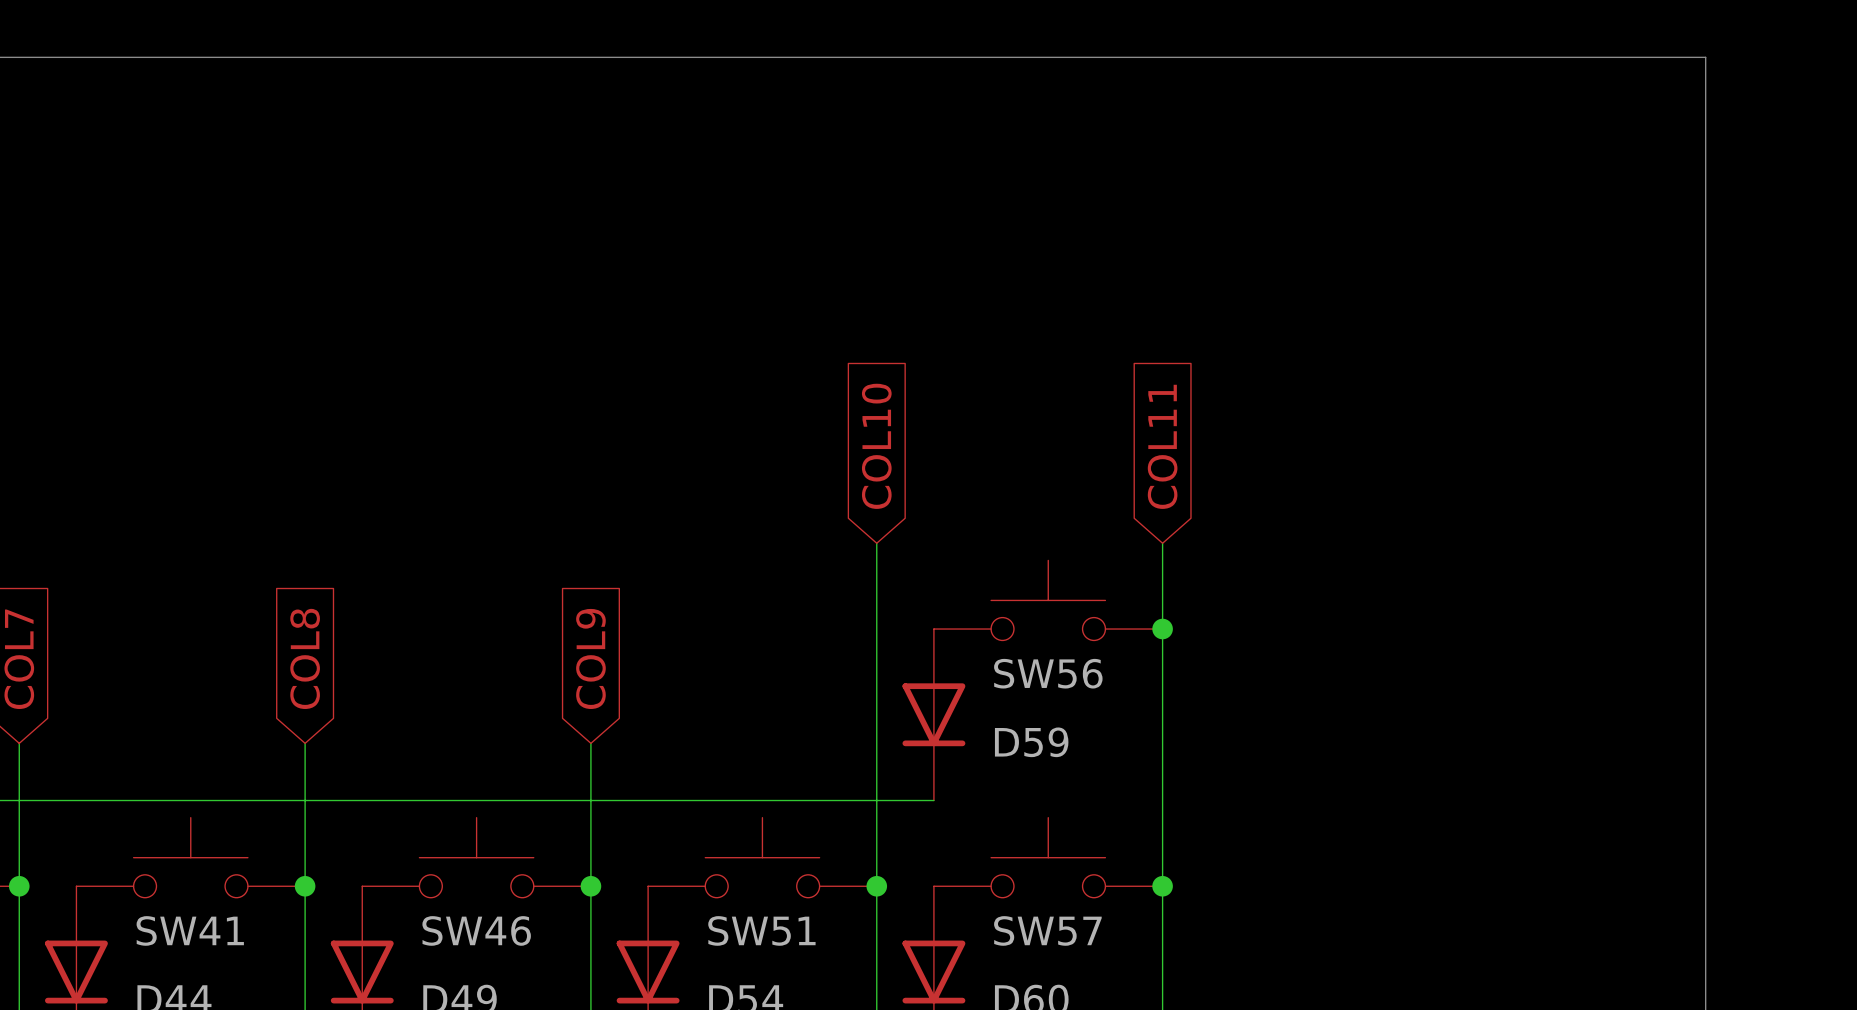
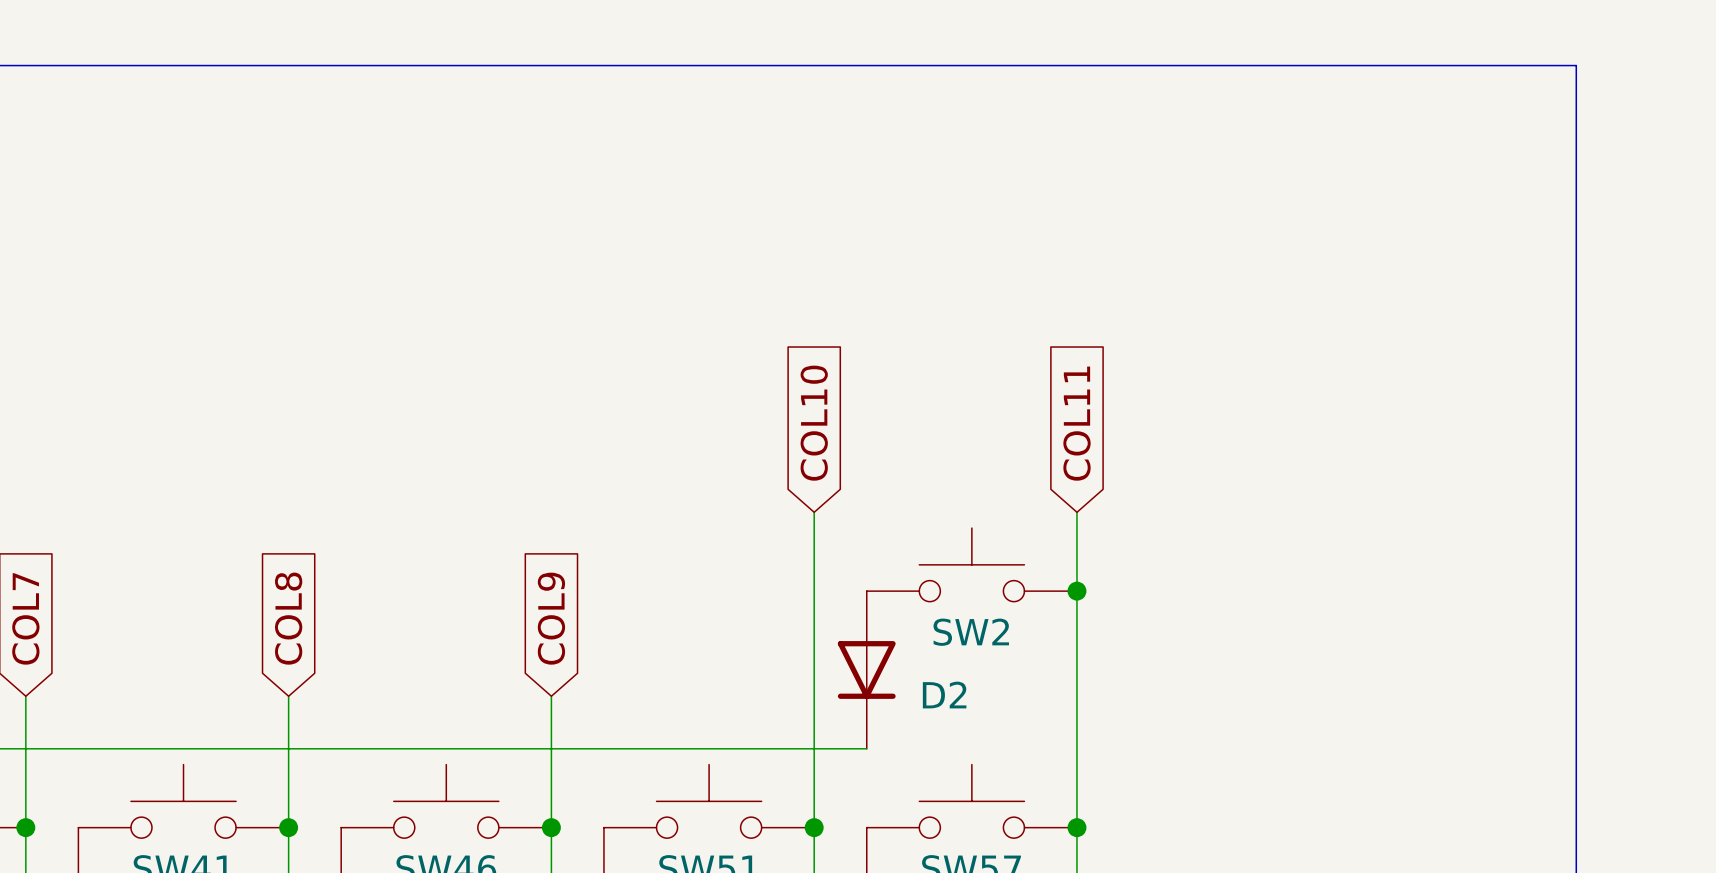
SW56 name: SW56 (1048, 673) -> SW2 (971, 632)
D59 name: D59 (1031, 742) -> D2 (944, 695)

